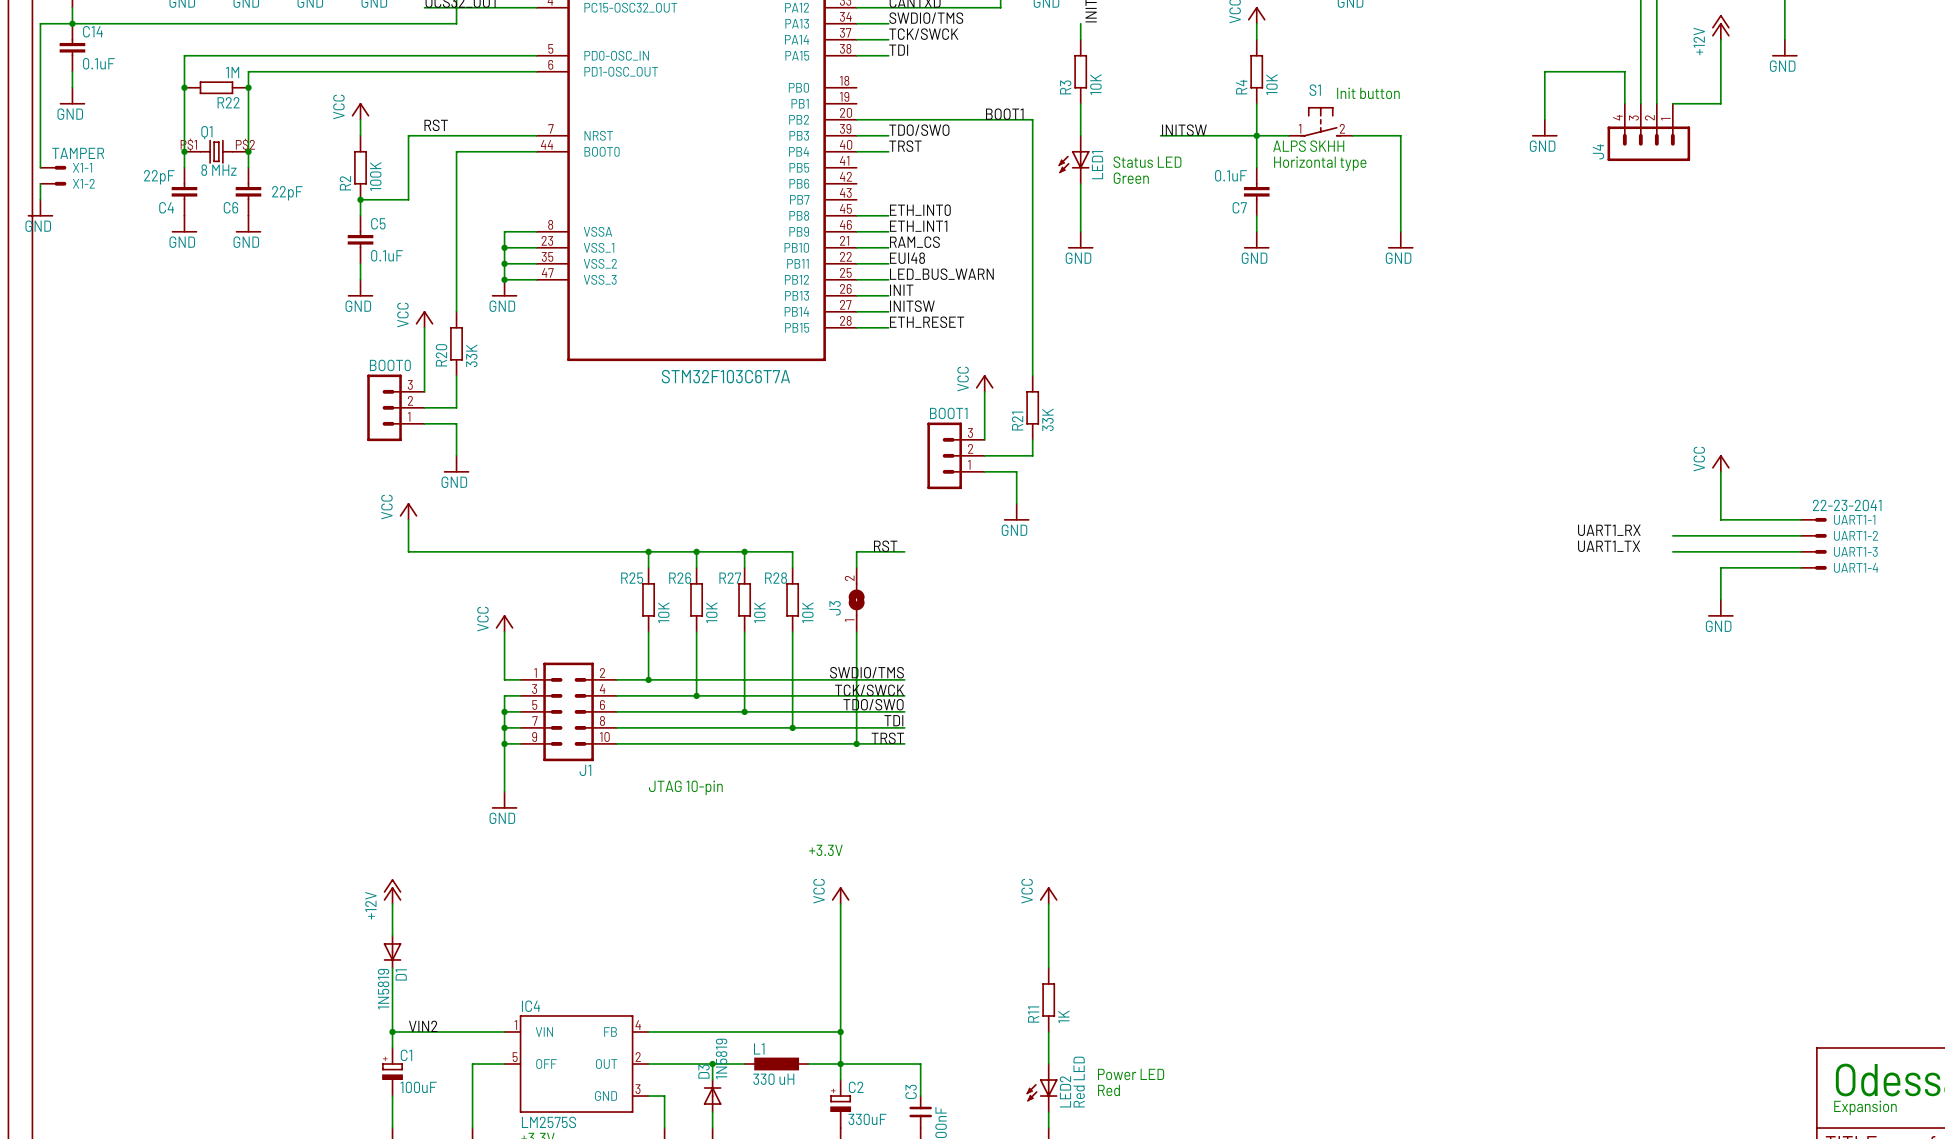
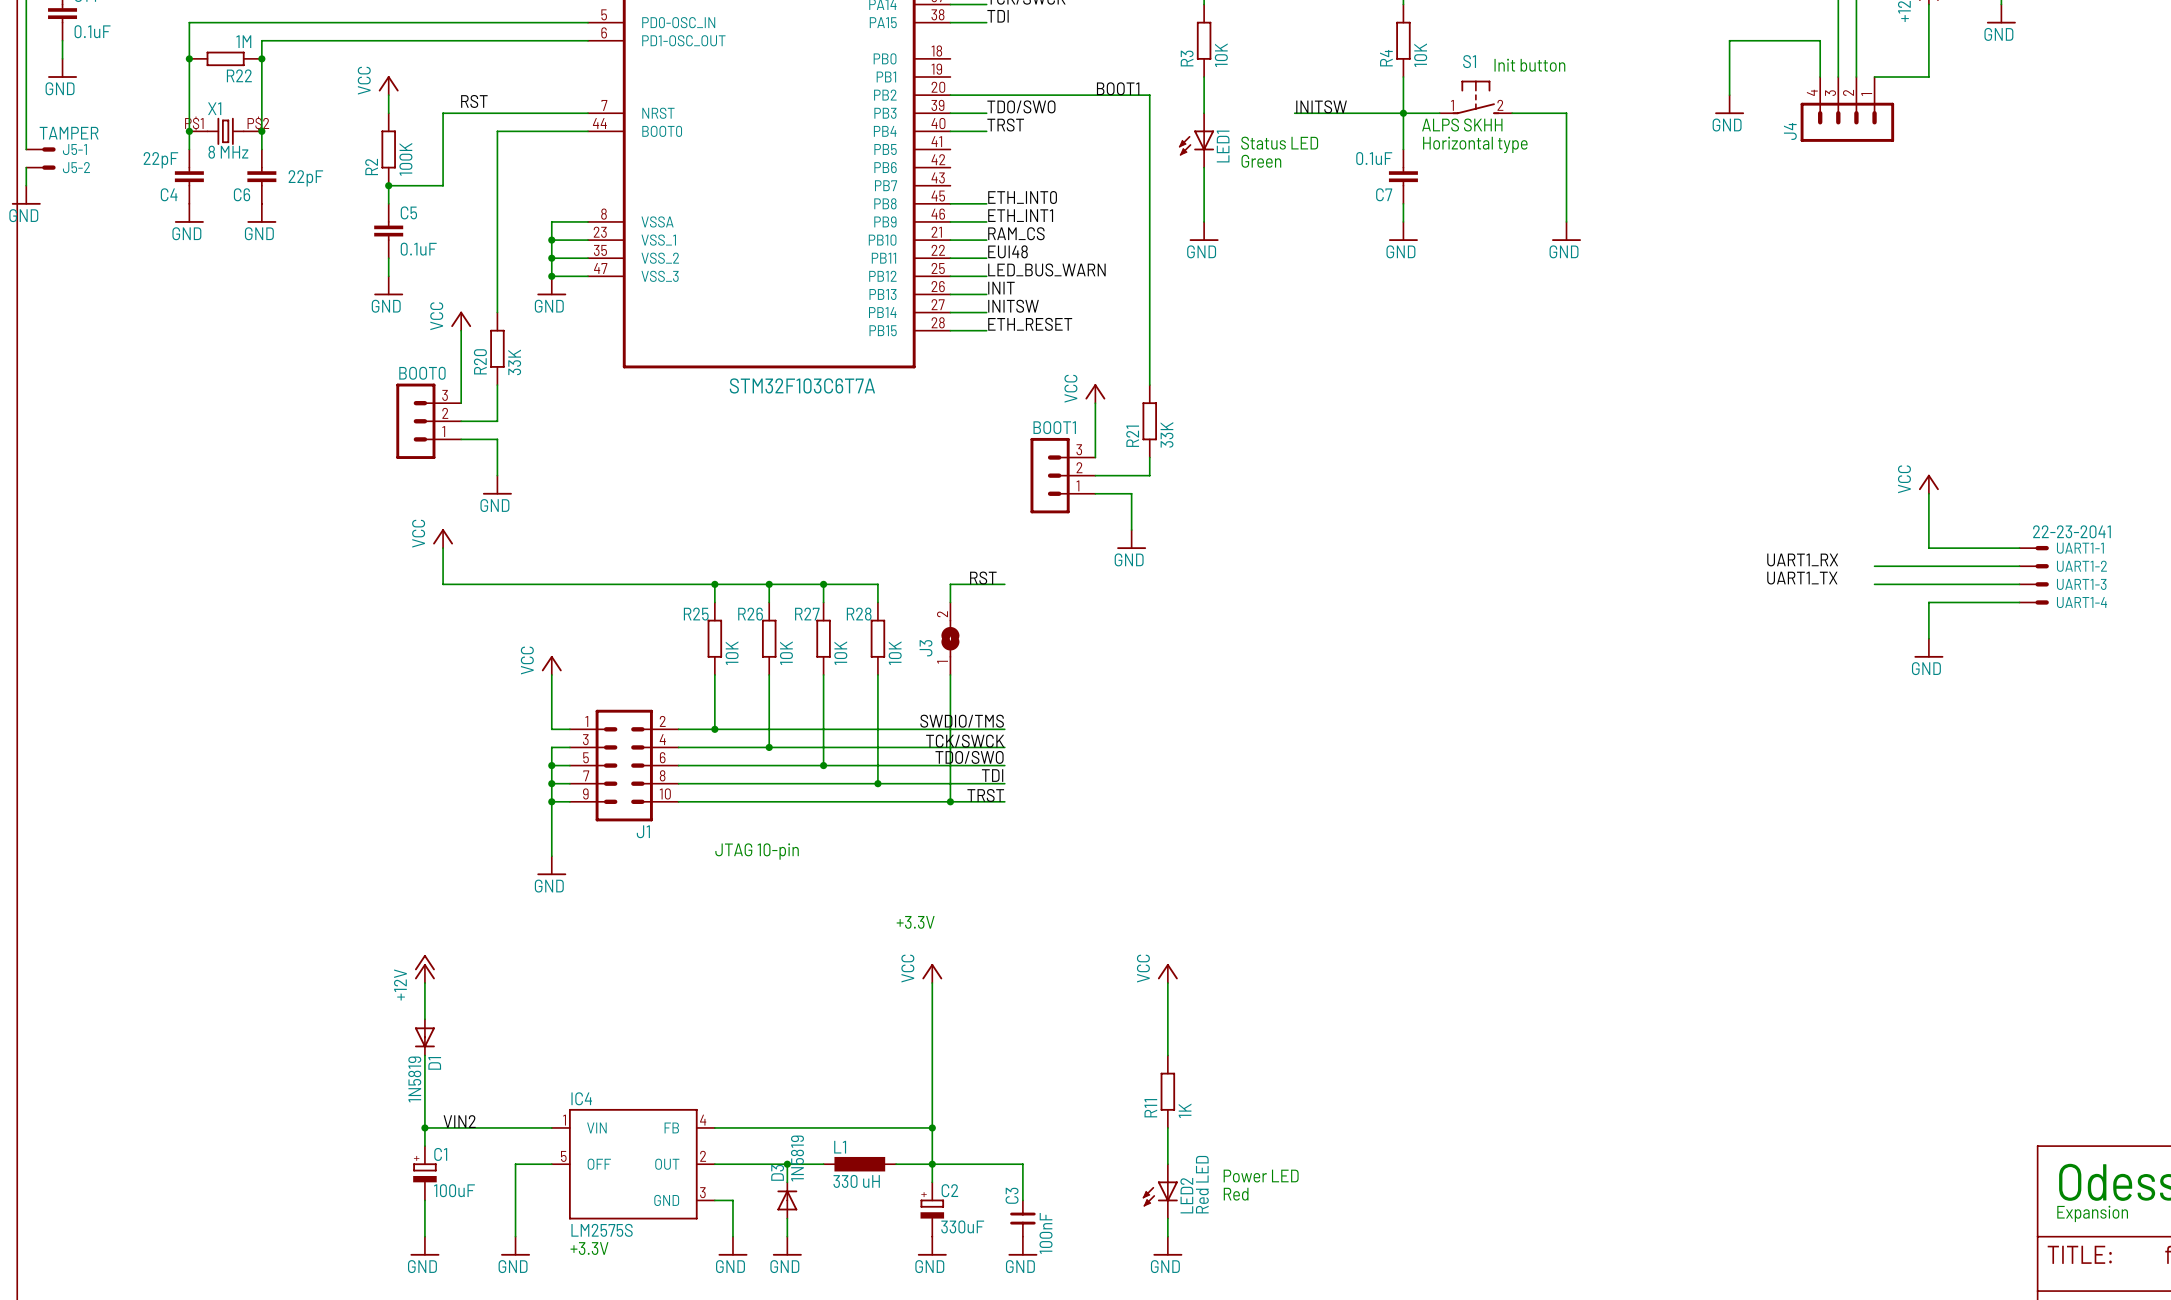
Q1 name: Q1 (206, 132) -> X1 (214, 108)
X1-1 name: X1-1 (82, 167) -> J5-1 (74, 149)
X1-2 name: X1-2 (83, 183) -> J5-2 (76, 167)

